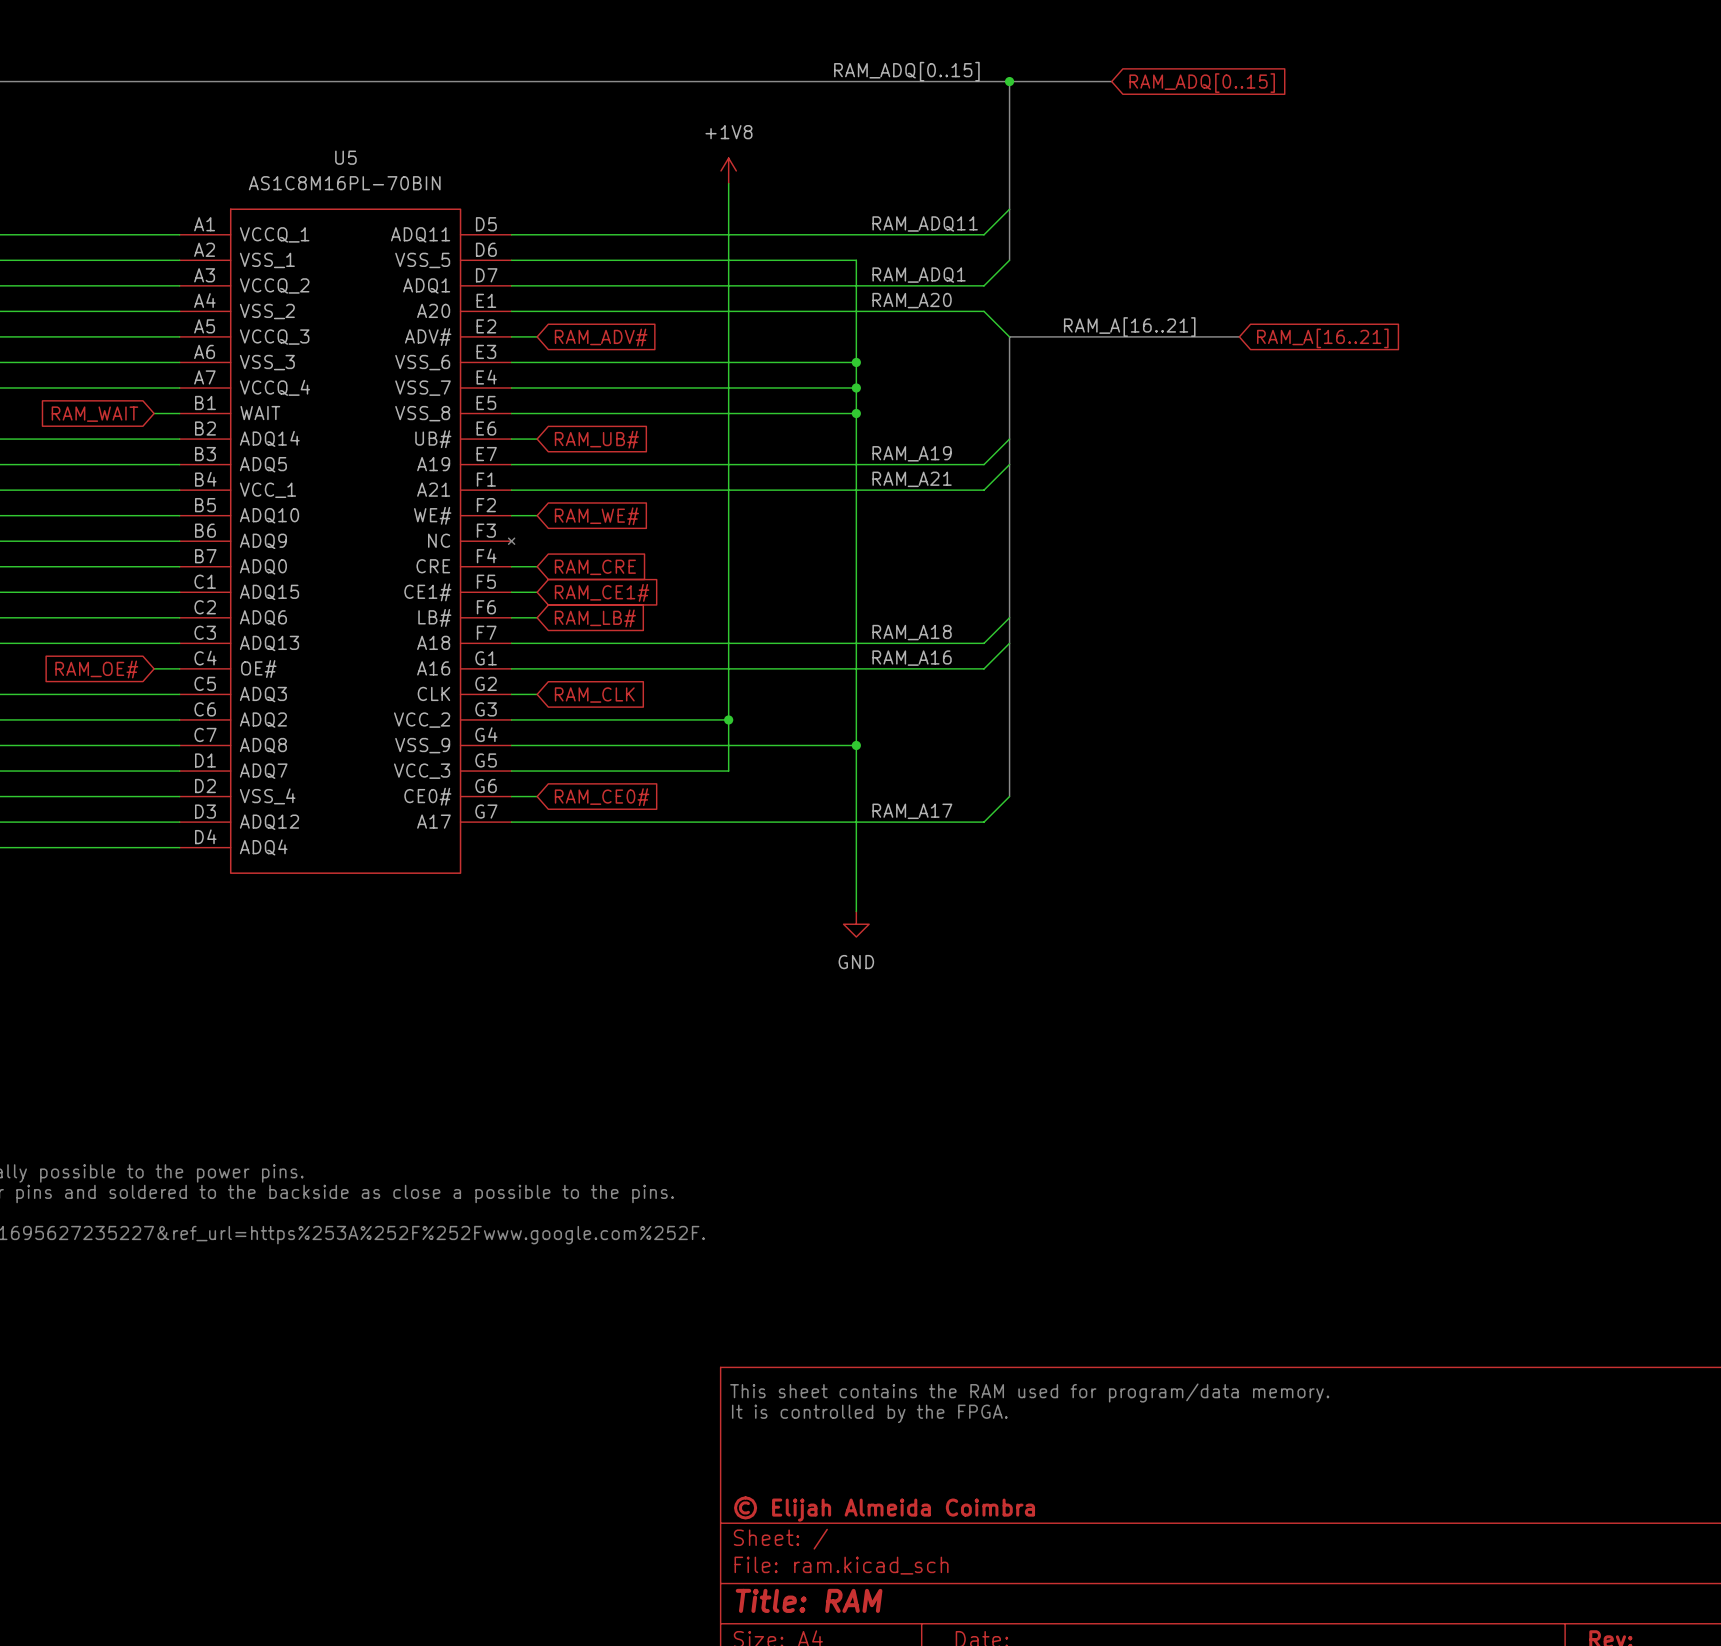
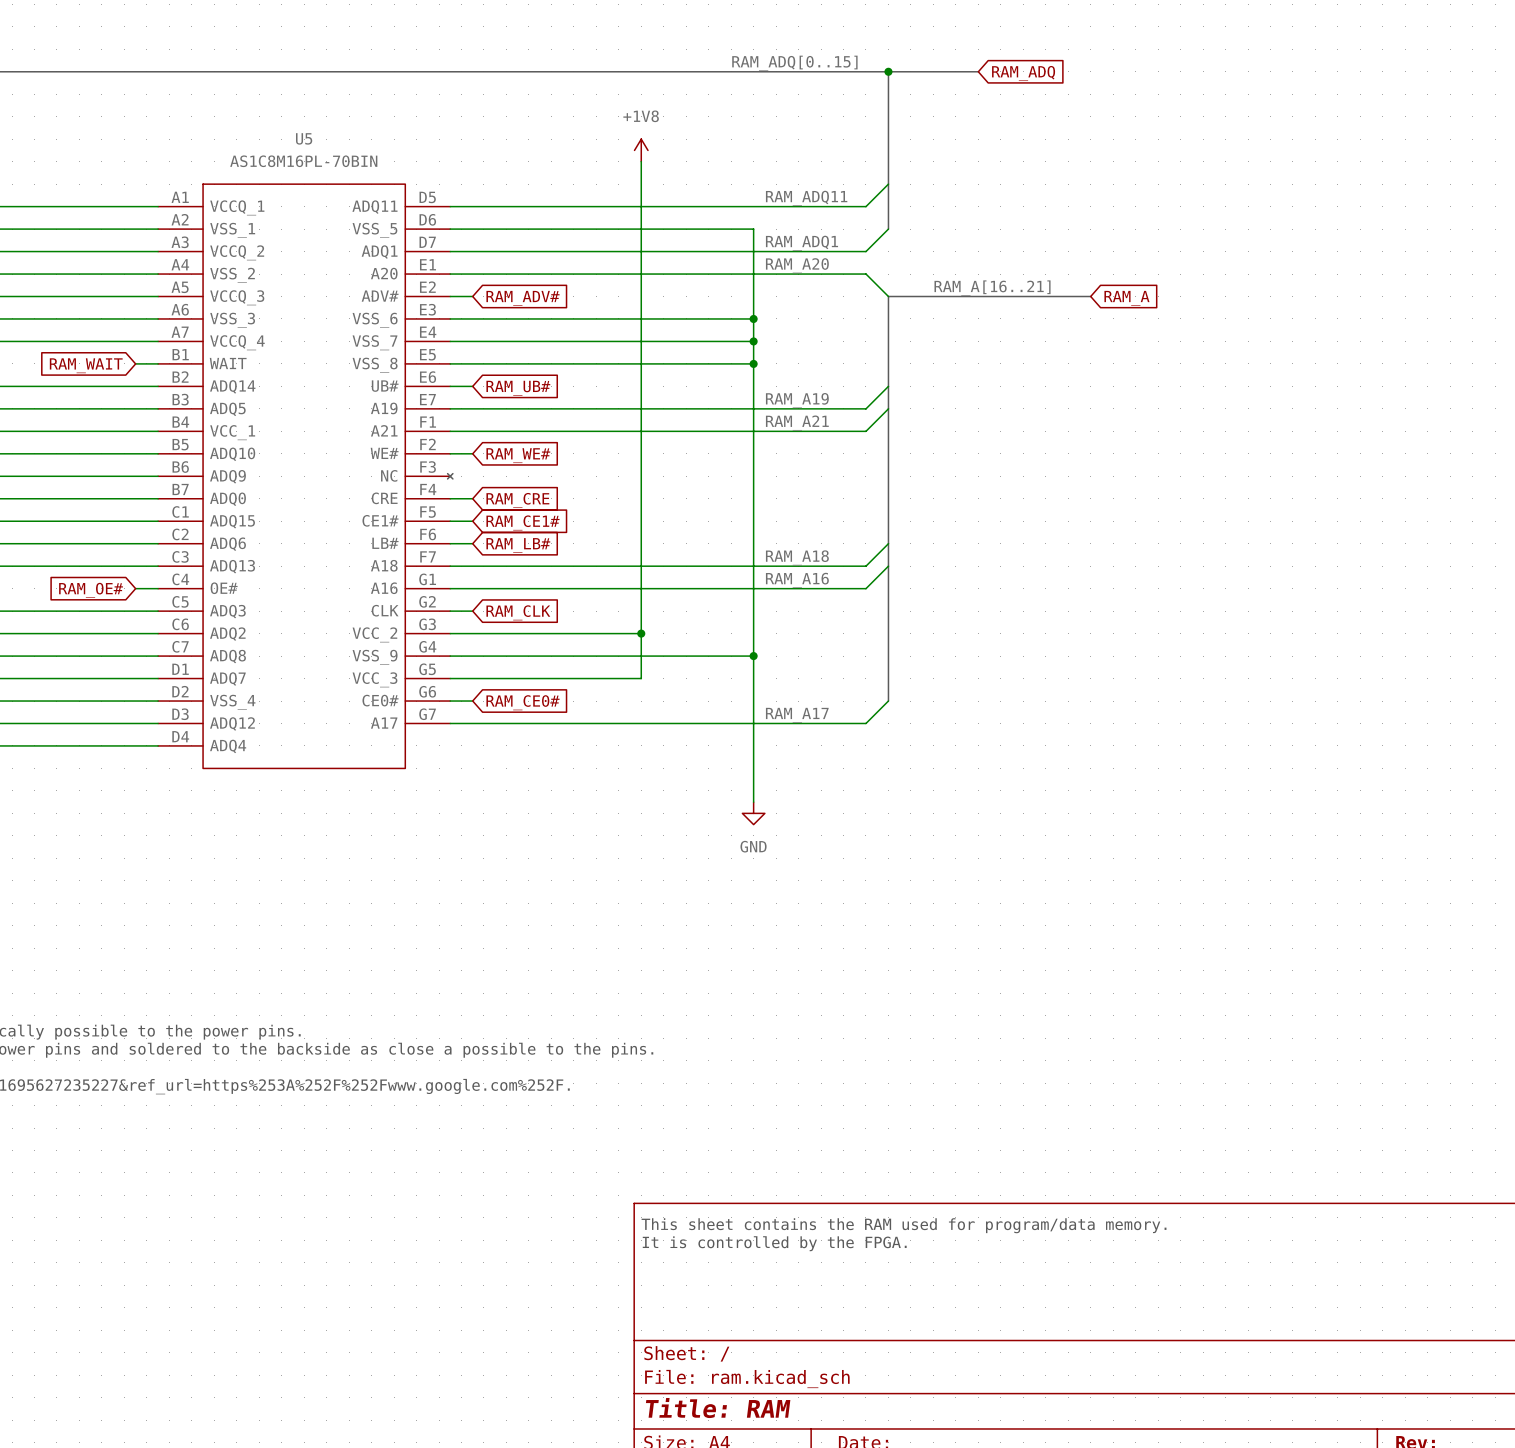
global label: RAM_ADQ[0..15] (1202, 83) -> RAM_ADQ (1023, 73)
global label: RAM_A[16..21] (1322, 338) -> RAM_A (1126, 298)
title block: © Elijah Almeida Coimbra (884, 1509) -> none

